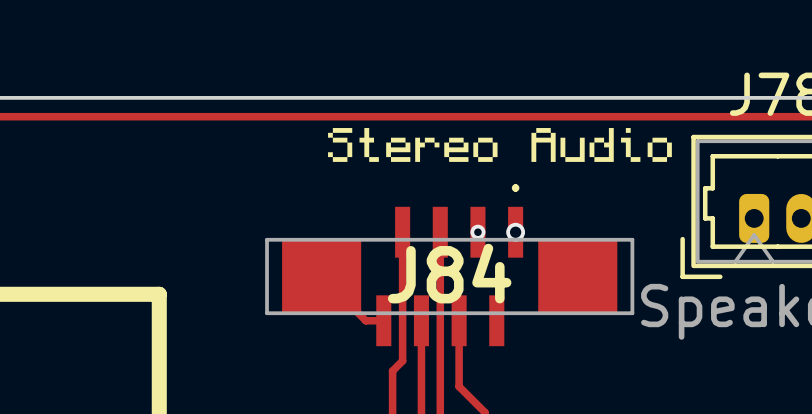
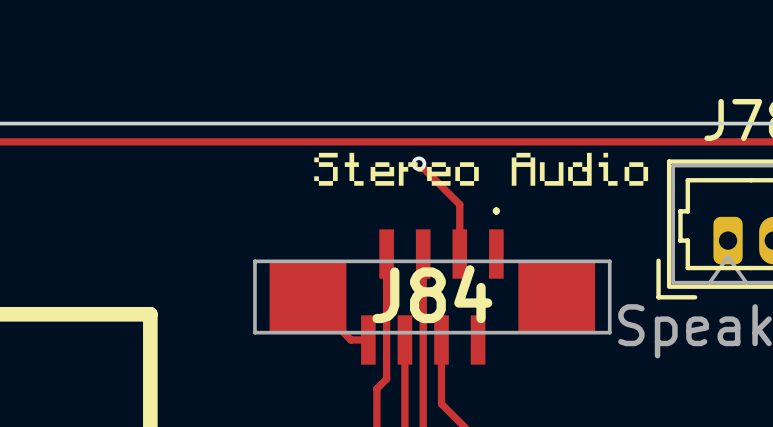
track: none -> (418, 163) (459, 204) (459, 254)
via position: (477, 232) -> (418, 163)
via: (515, 232) -> none

